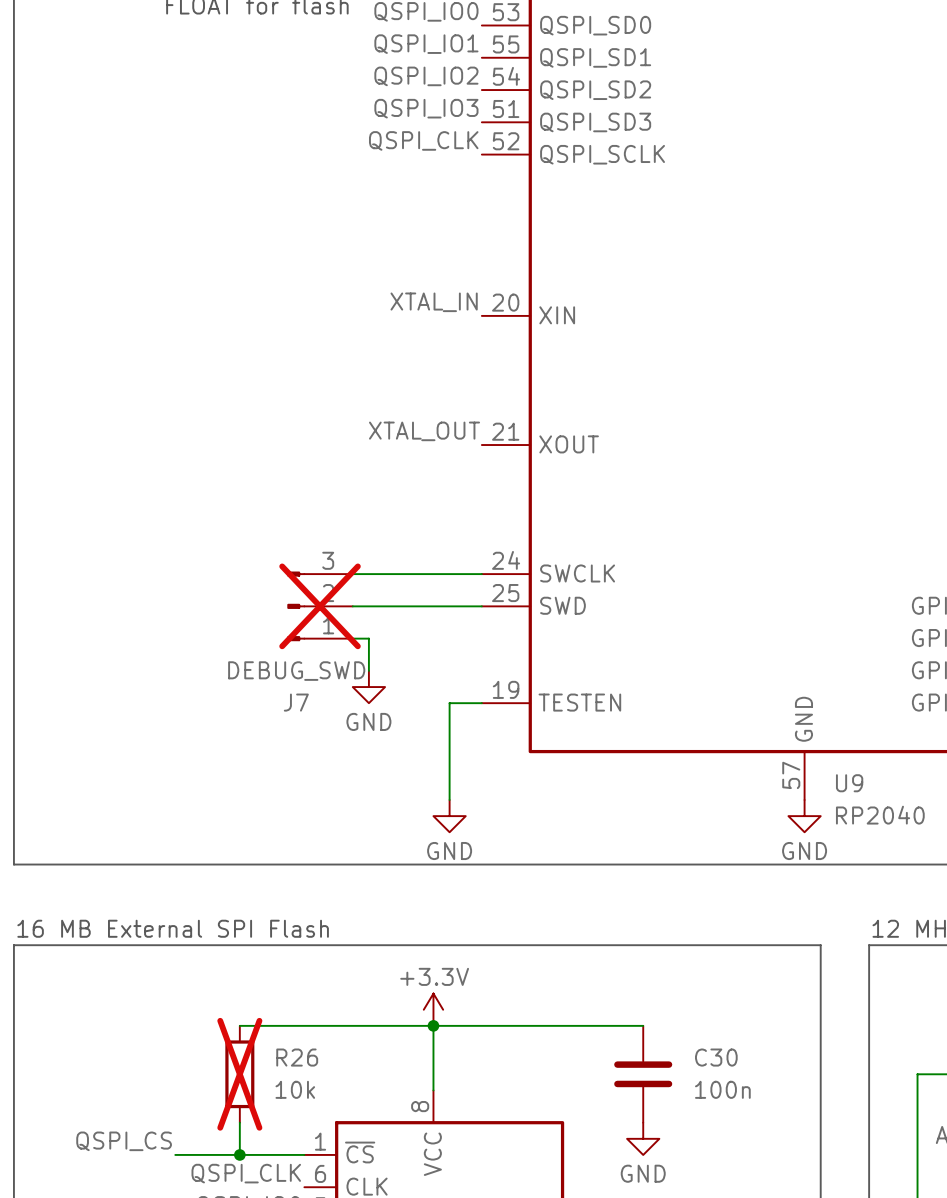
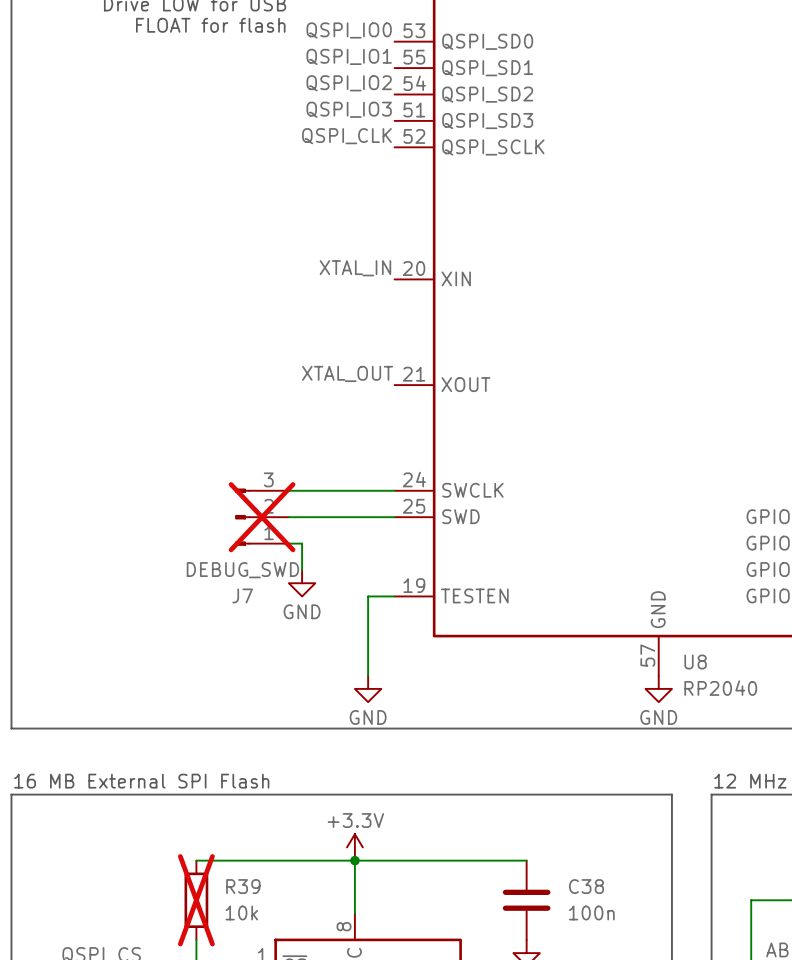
U9 name: U9 (849, 783) -> U8 (695, 662)
R26 name: R26 (297, 1057) -> R39 (243, 886)
C30 name: C30 (716, 1057) -> C38 (586, 886)

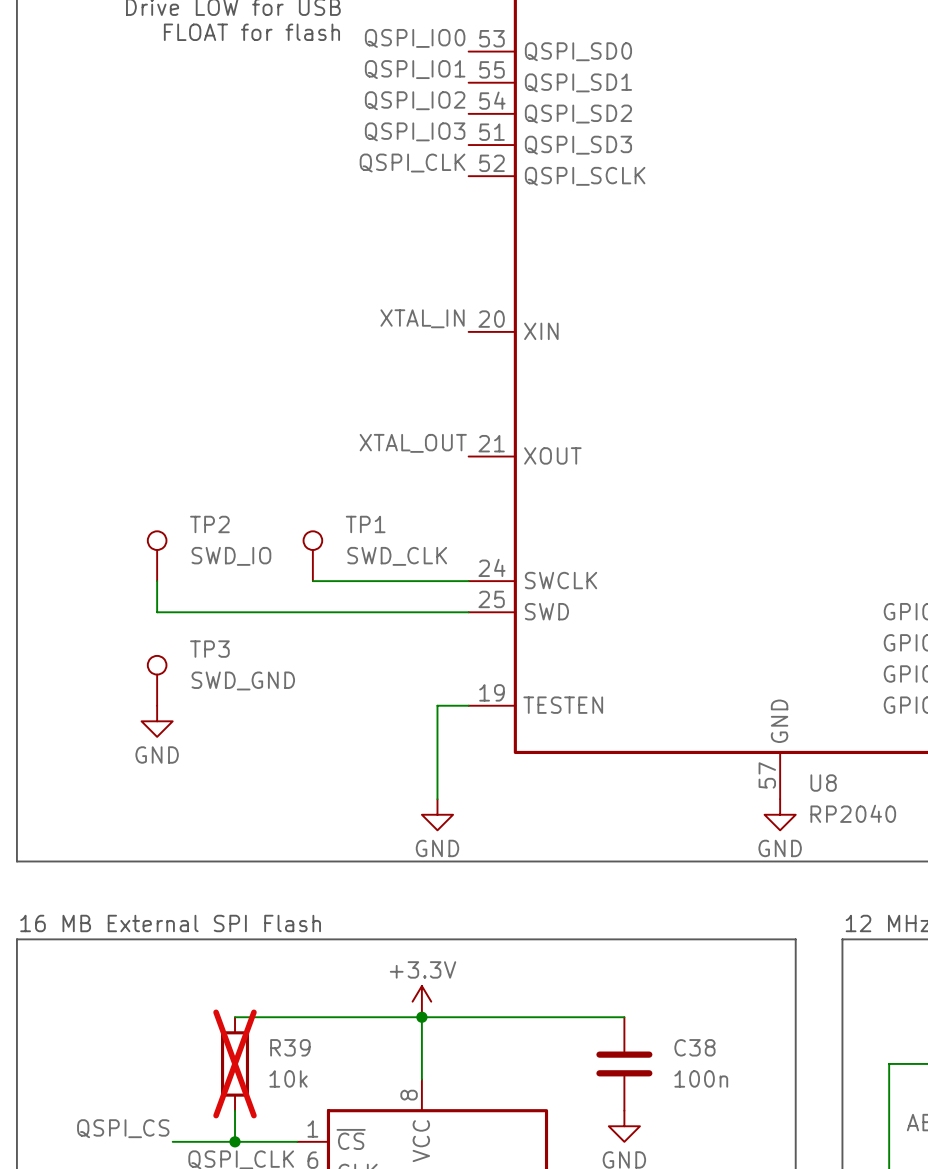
TP2: none -> SWD_IO (157, 556)
TP1: none -> SWD_CLK (312, 556)
wire: none -> (157, 581) (157, 612) (344, 612)
J7: DEBUG_SWD (262, 517) -> none
wire: (288, 543) (302, 543) (302, 570) -> none
TP3: none -> SWD_GND (157, 680)
power symbol position: GND (302, 583) -> GND (157, 721)

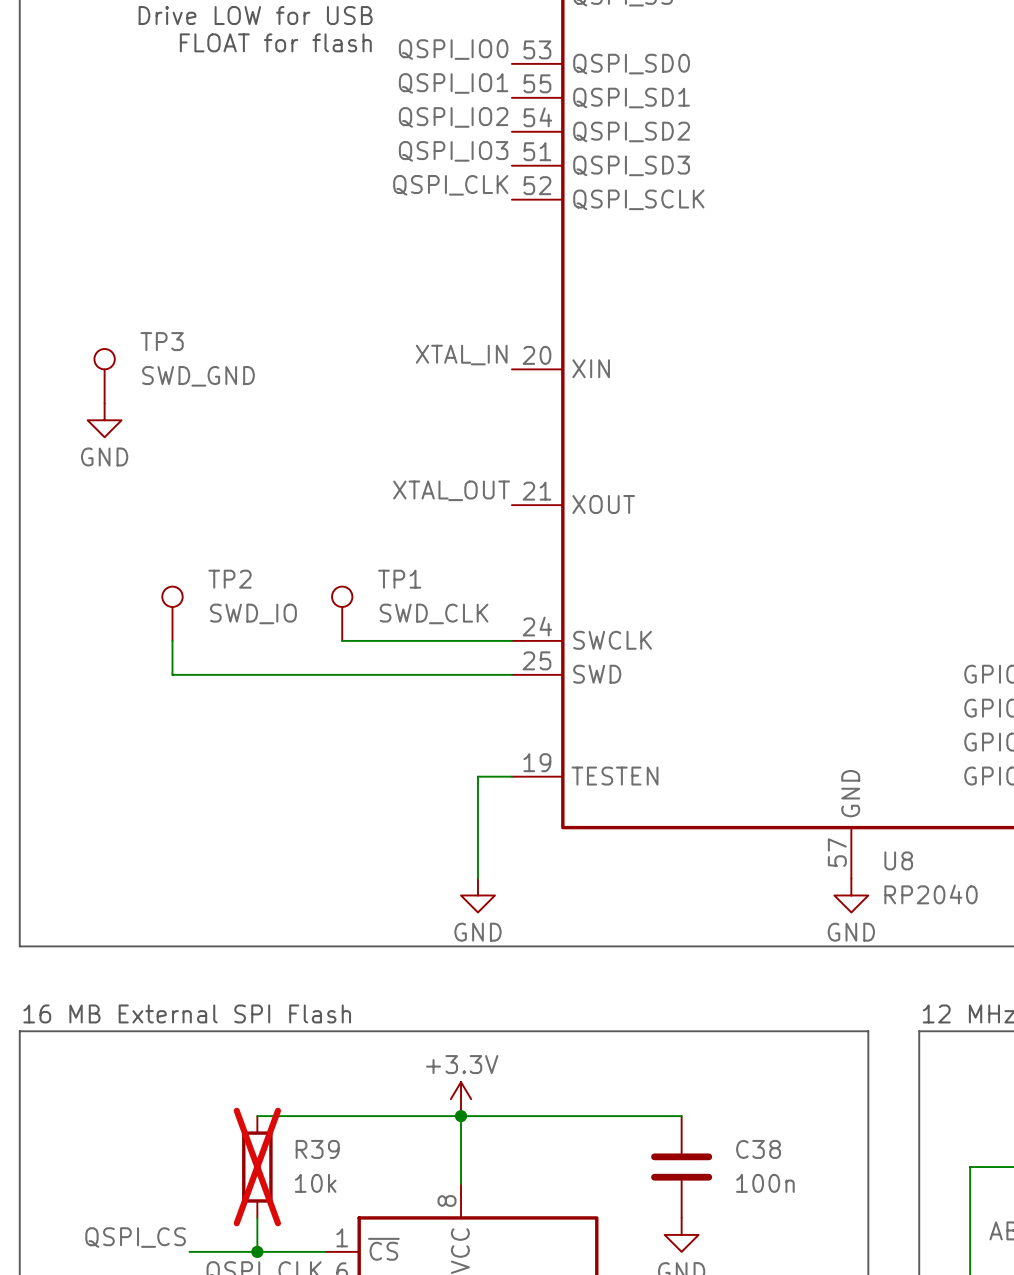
power symbol: none -> GND (104, 420)
TP3 position: (157, 680) -> (104, 376)
power symbol: GND (157, 721) -> none

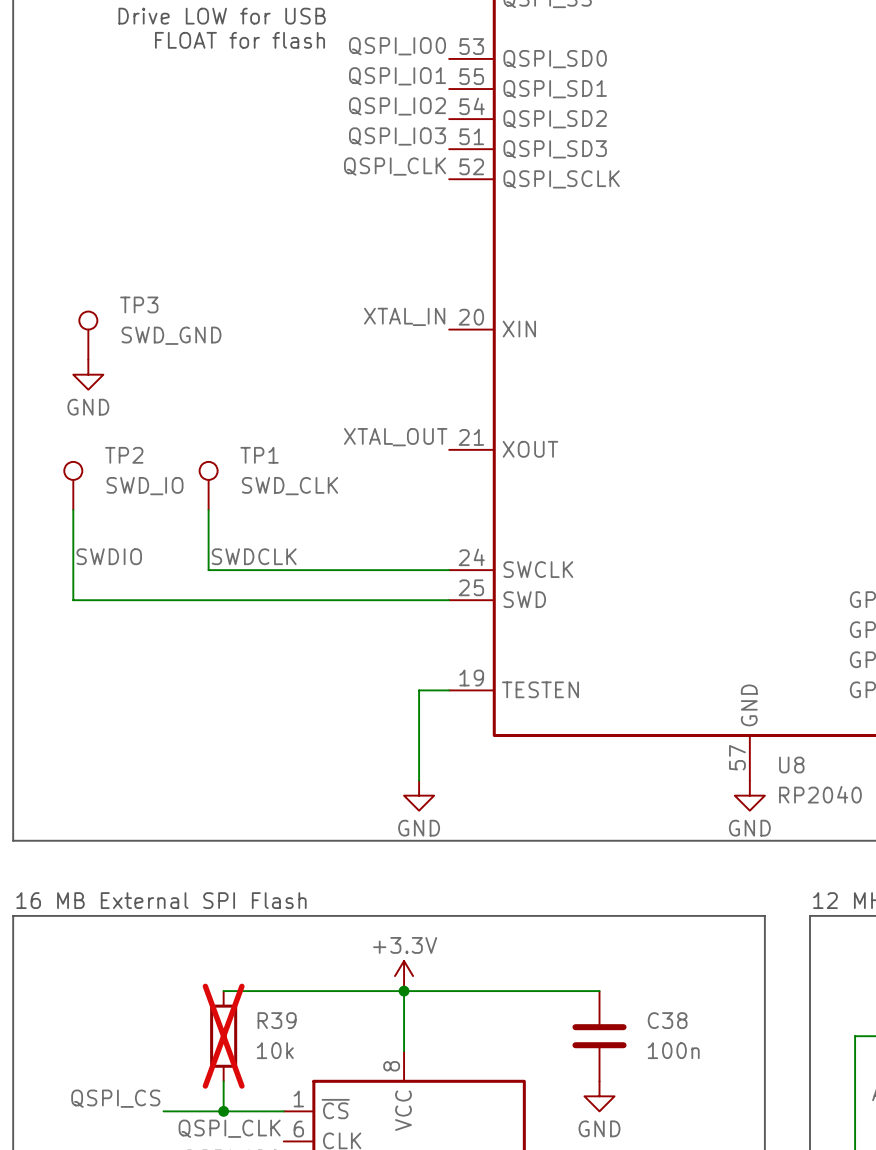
wire: none -> (208, 509) (208, 570) (298, 570)
TP2 position: (172, 613) -> (73, 485)
TP1 position: (342, 613) -> (208, 485)
label: none -> SWDIO (109, 556)
label: none -> SWDCLK (254, 556)
wire: (172, 640) (172, 674) -> (73, 509) (73, 600) (148, 600)

